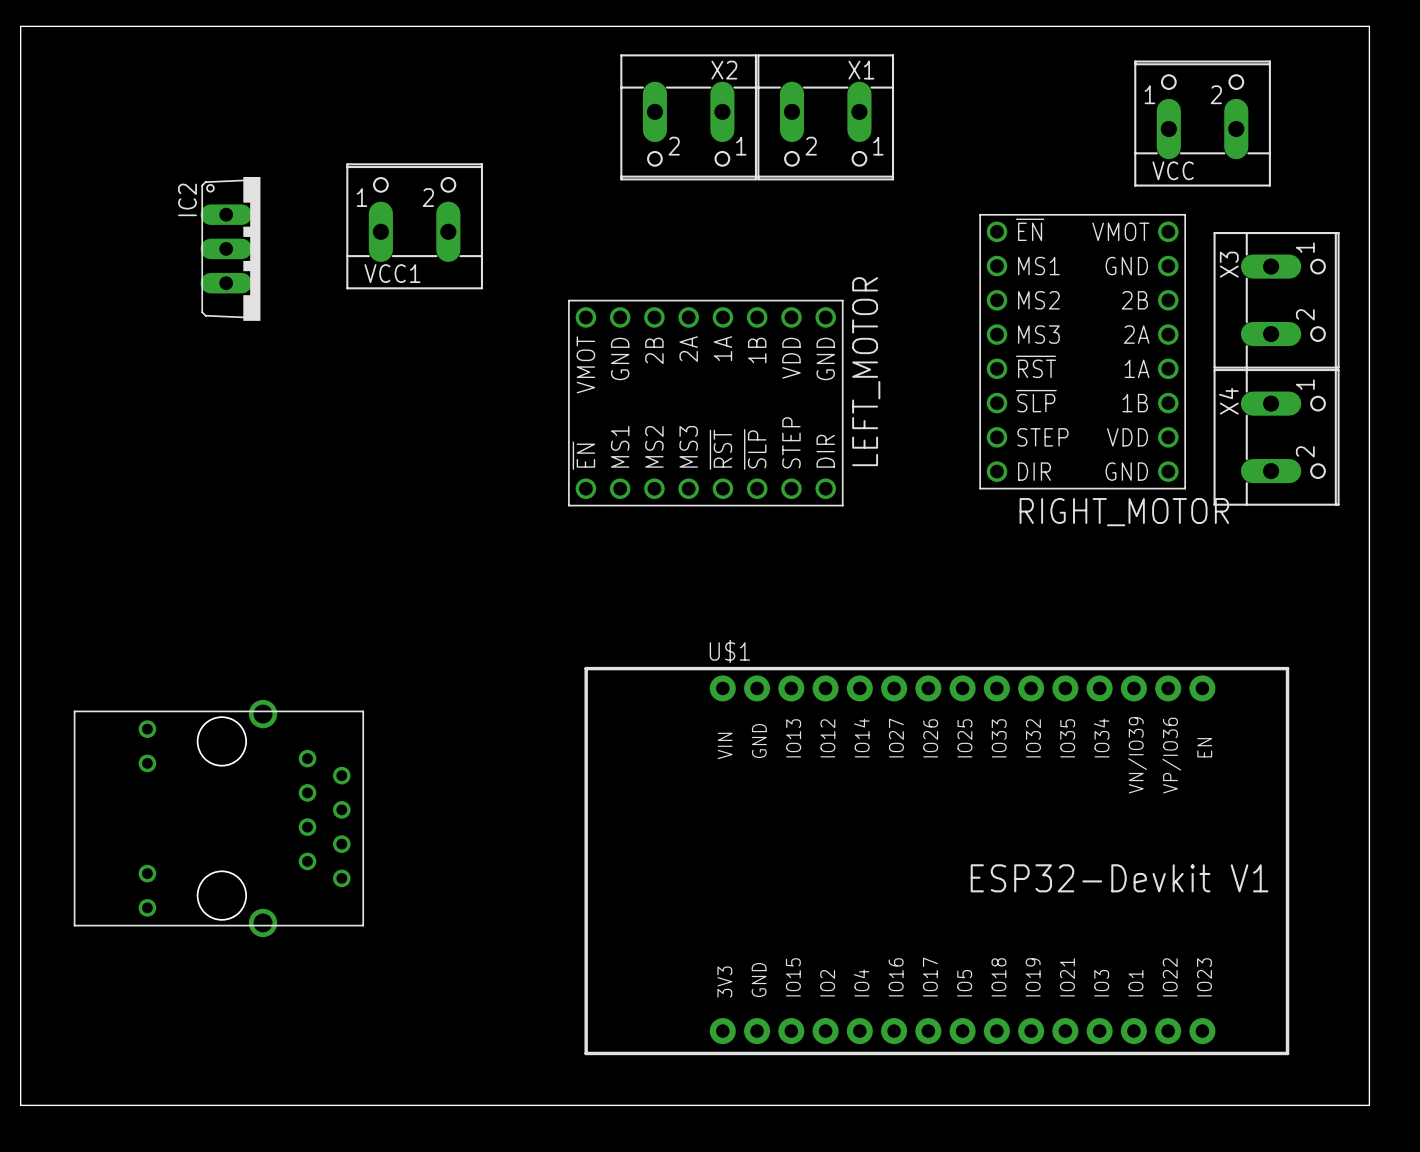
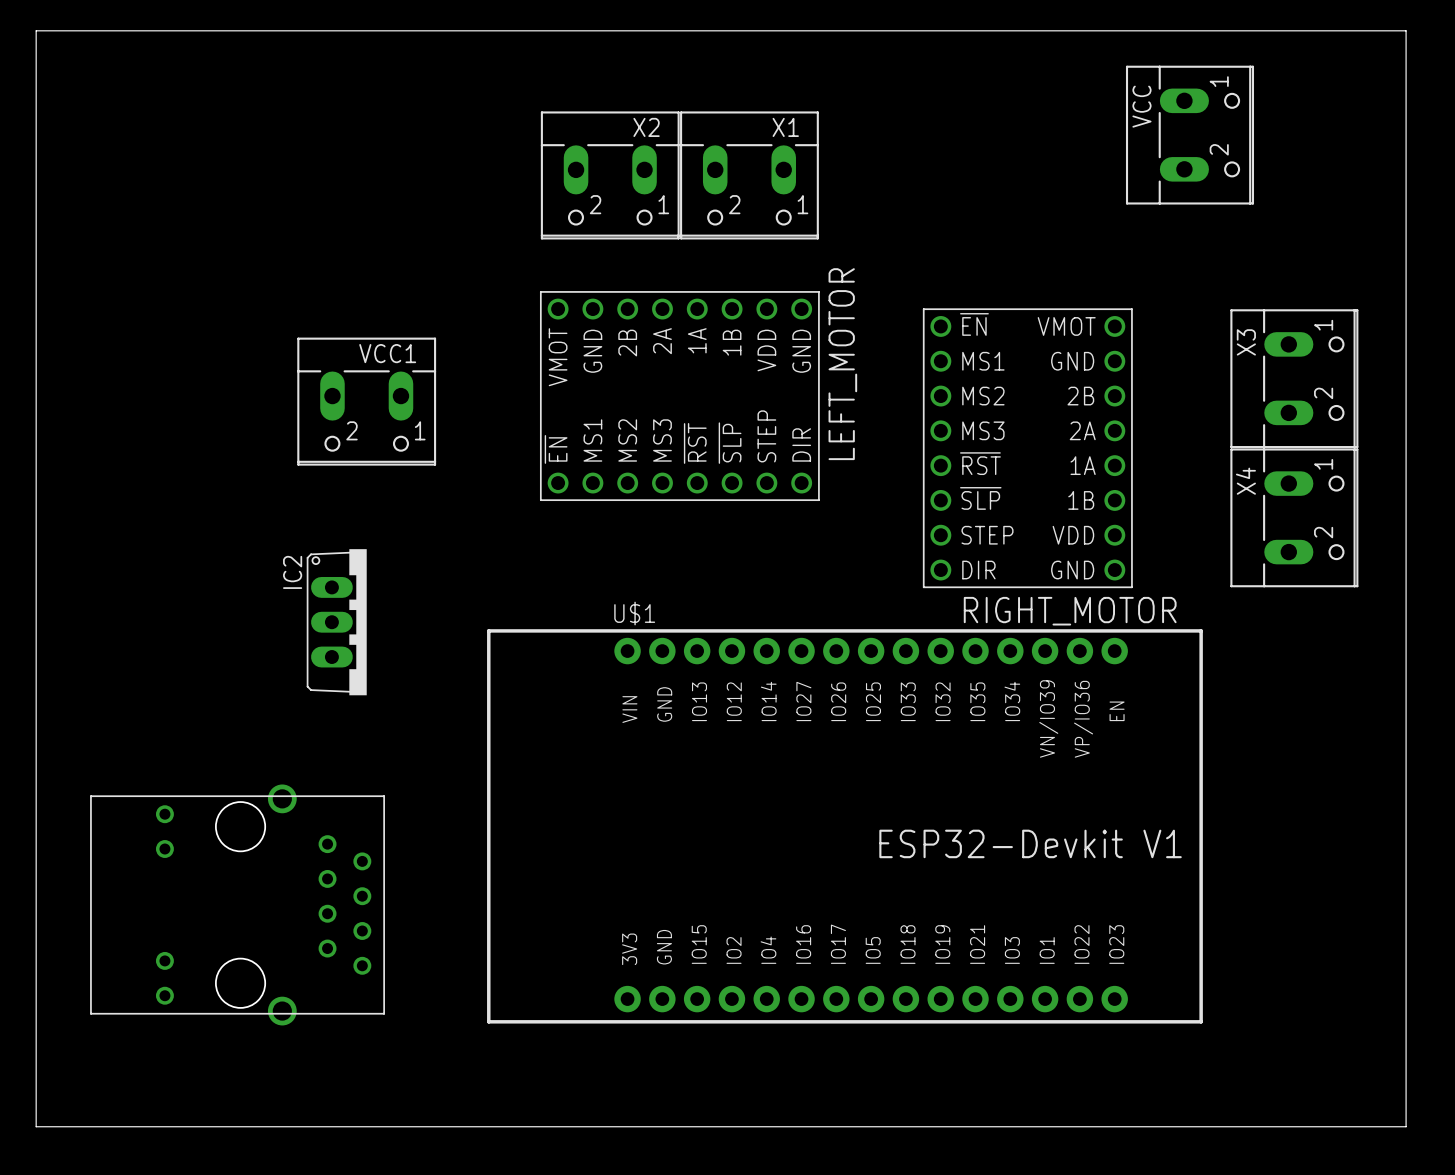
X2 footprint: [620, 54, 758, 181] -> [540, 111, 680, 240]
X1 footprint: [757, 54, 895, 181] -> [680, 111, 819, 240]
VCC: (1202, 123) -> none
VCC: none -> (1189, 135)
VCC1 footprint: [346, 163, 483, 290] -> [297, 337, 437, 466]
IC2 footprint: [200, 176, 261, 321] -> [306, 549, 367, 696]
X3 footprint: [1213, 231, 1340, 369] -> [1230, 309, 1359, 449]
VCC1 name position: VCC1 (392, 273) -> VCC1 (387, 353)
RIGHT_MOTOR position: (1082, 351) -> (1027, 448)
X4 footprint: [1213, 369, 1340, 506] -> [1230, 448, 1359, 588]
LEFT_MOTOR position: (705, 403) -> (679, 396)
part position: (218, 818) -> (237, 904)
U$1 position: (936, 861) -> (844, 826)

